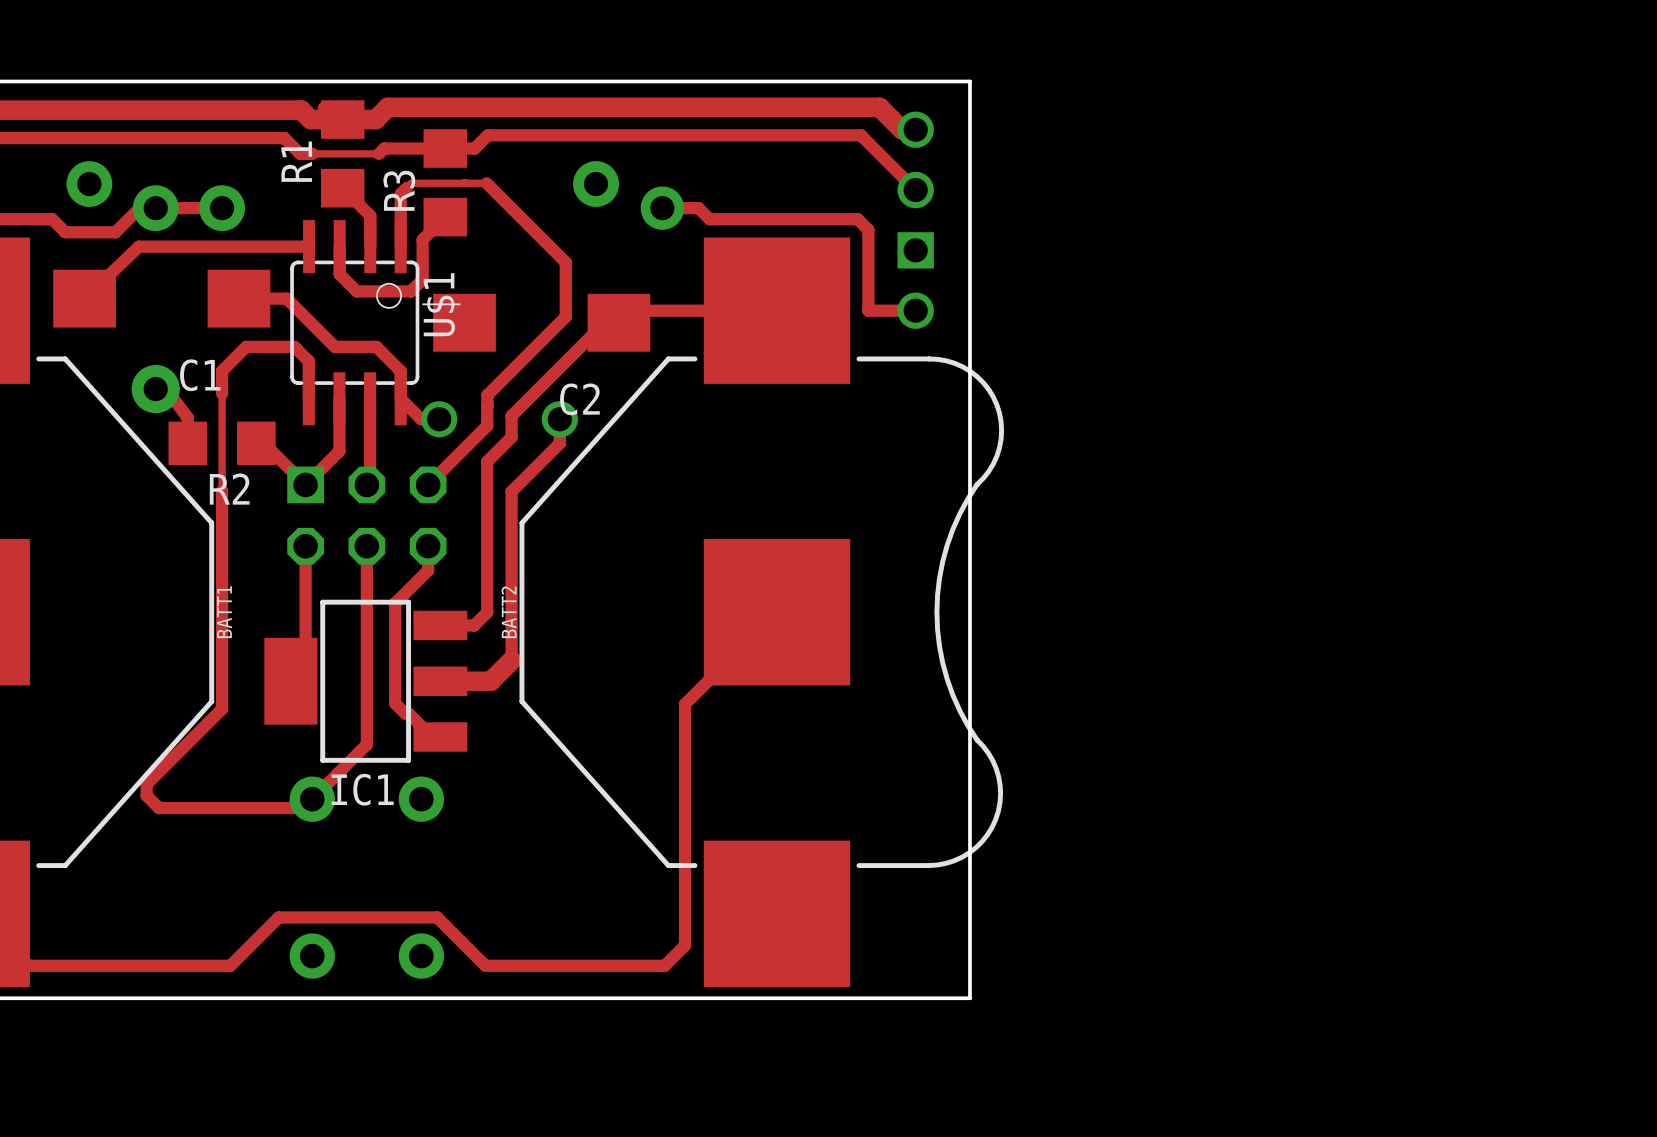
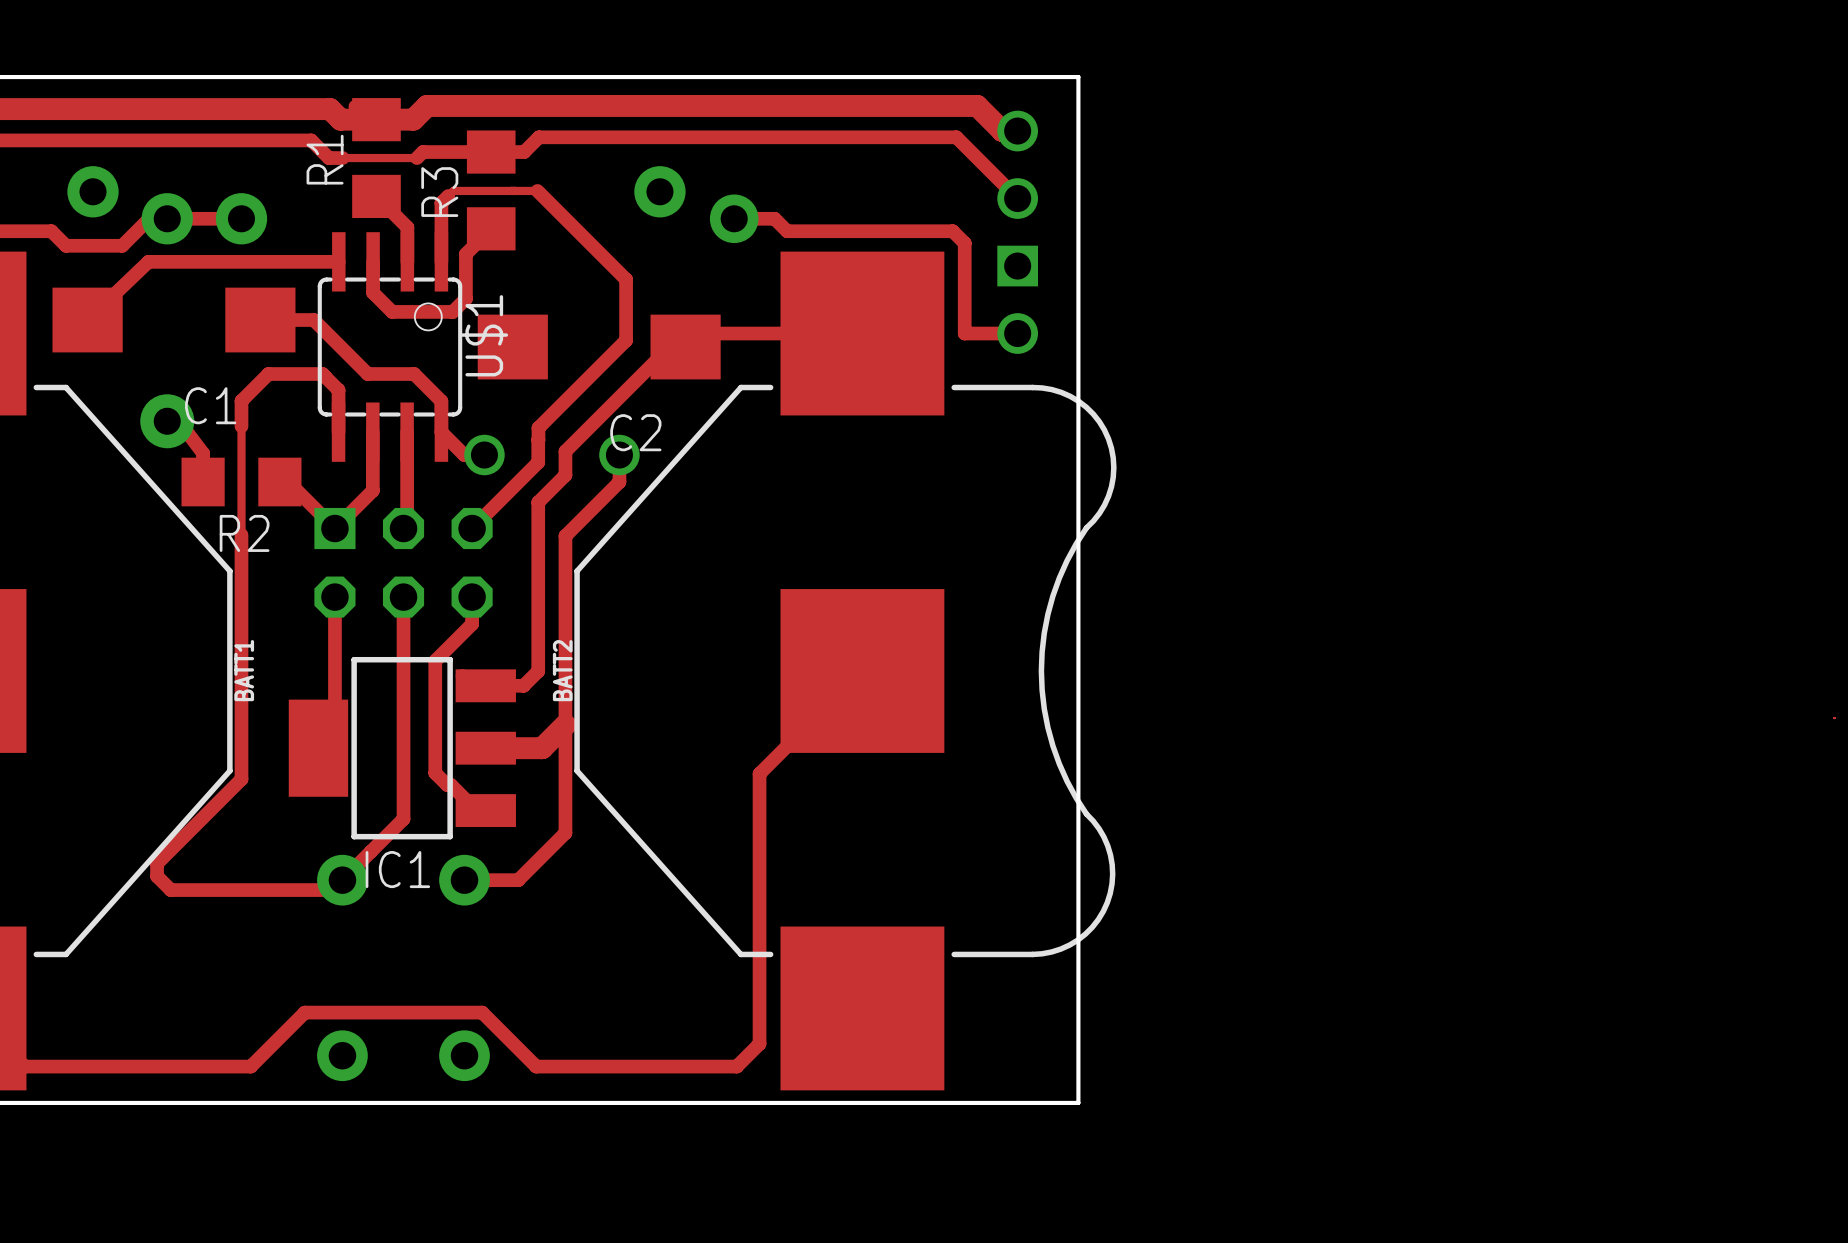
track: none -> (565, 724) (565, 832) (518, 880) (464, 880)

